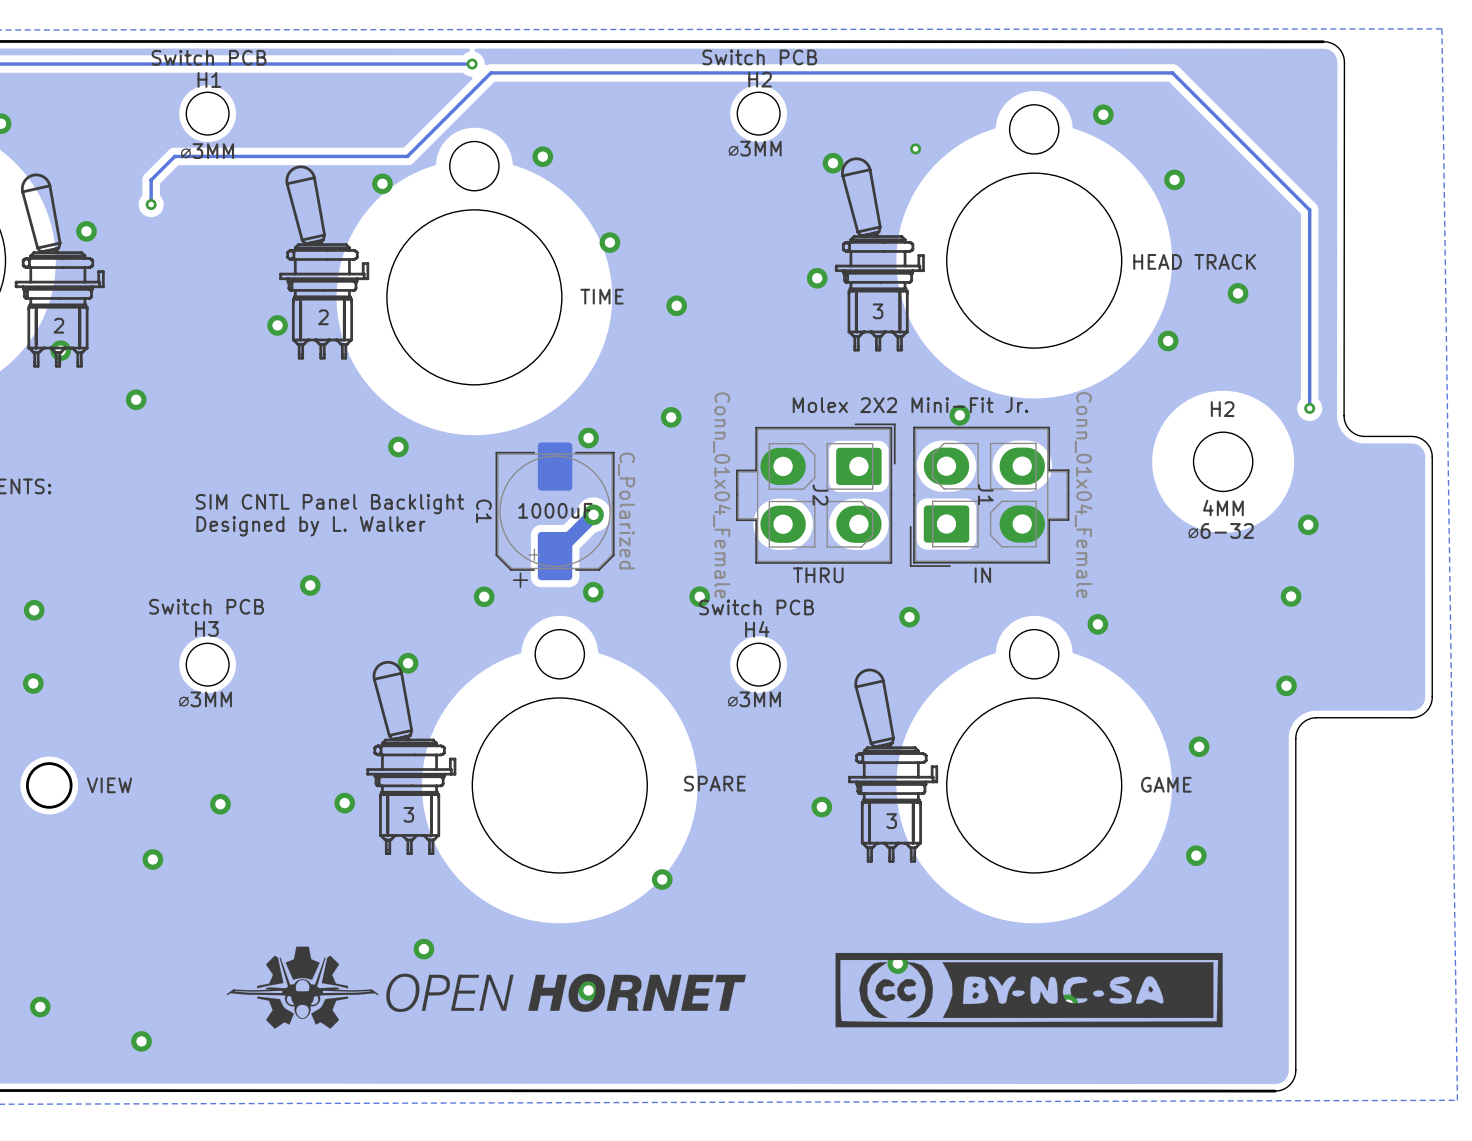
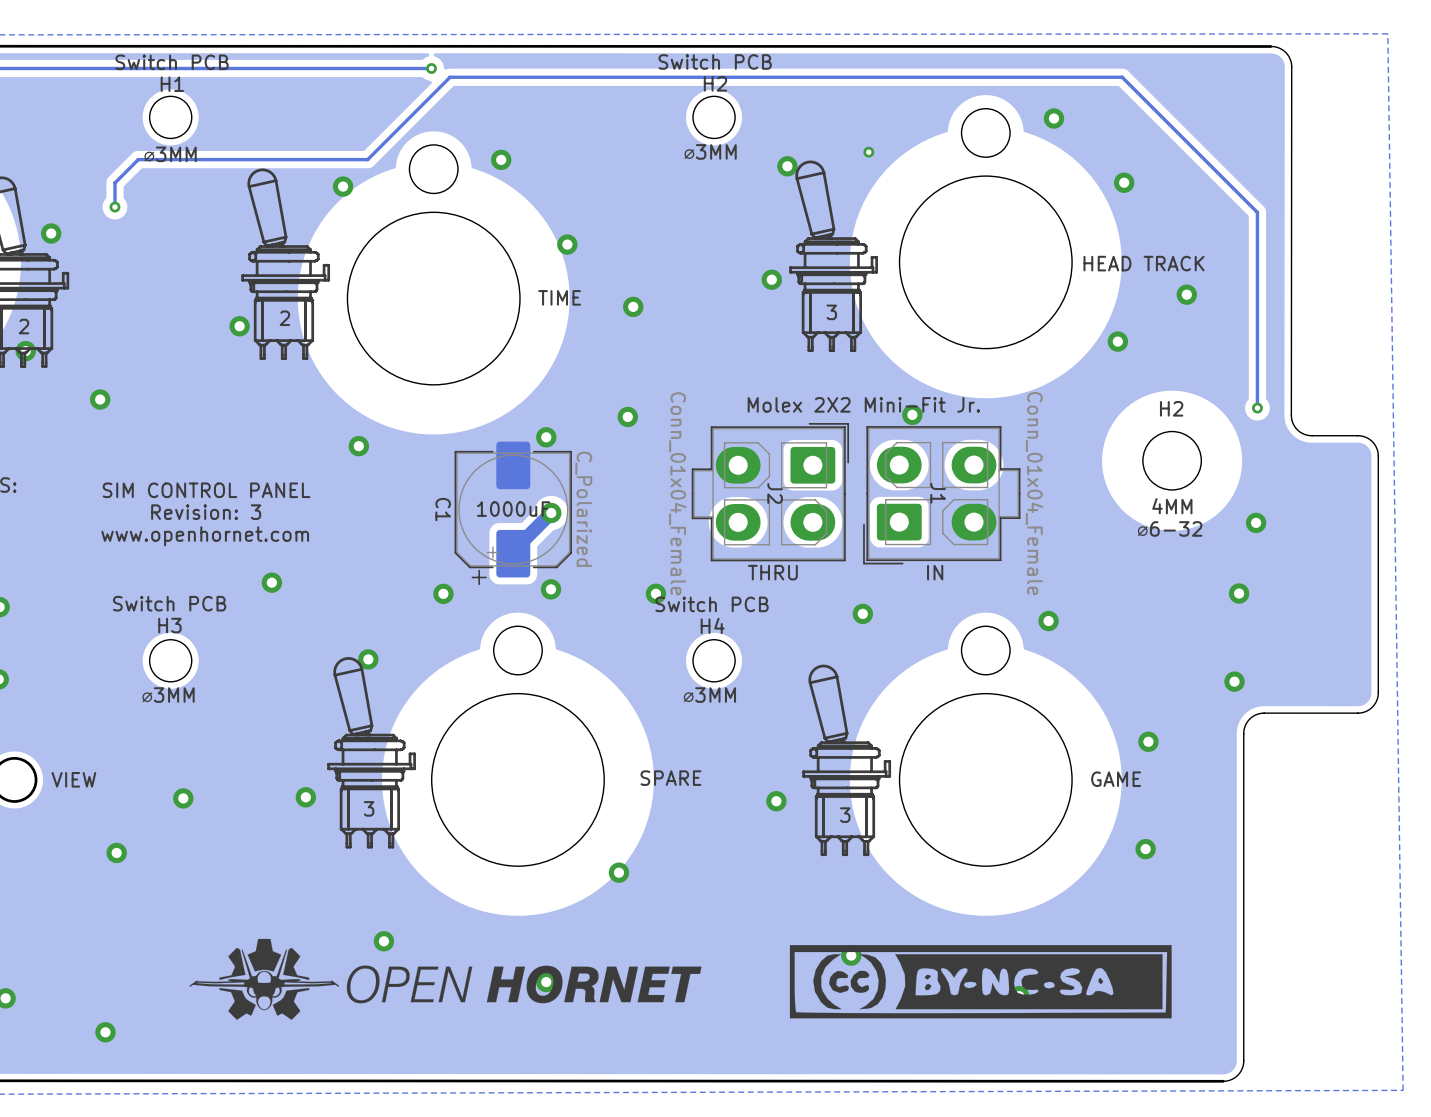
text: none -> SIM CONTROL PANEL (206, 490)
text: SIM CNTL Panel Backlight (329, 504) -> none
text: none -> Revision: 3 (206, 512)
text: Designed by L. Walker (310, 526) -> none
text: none -> www.openhornet.com (205, 536)

